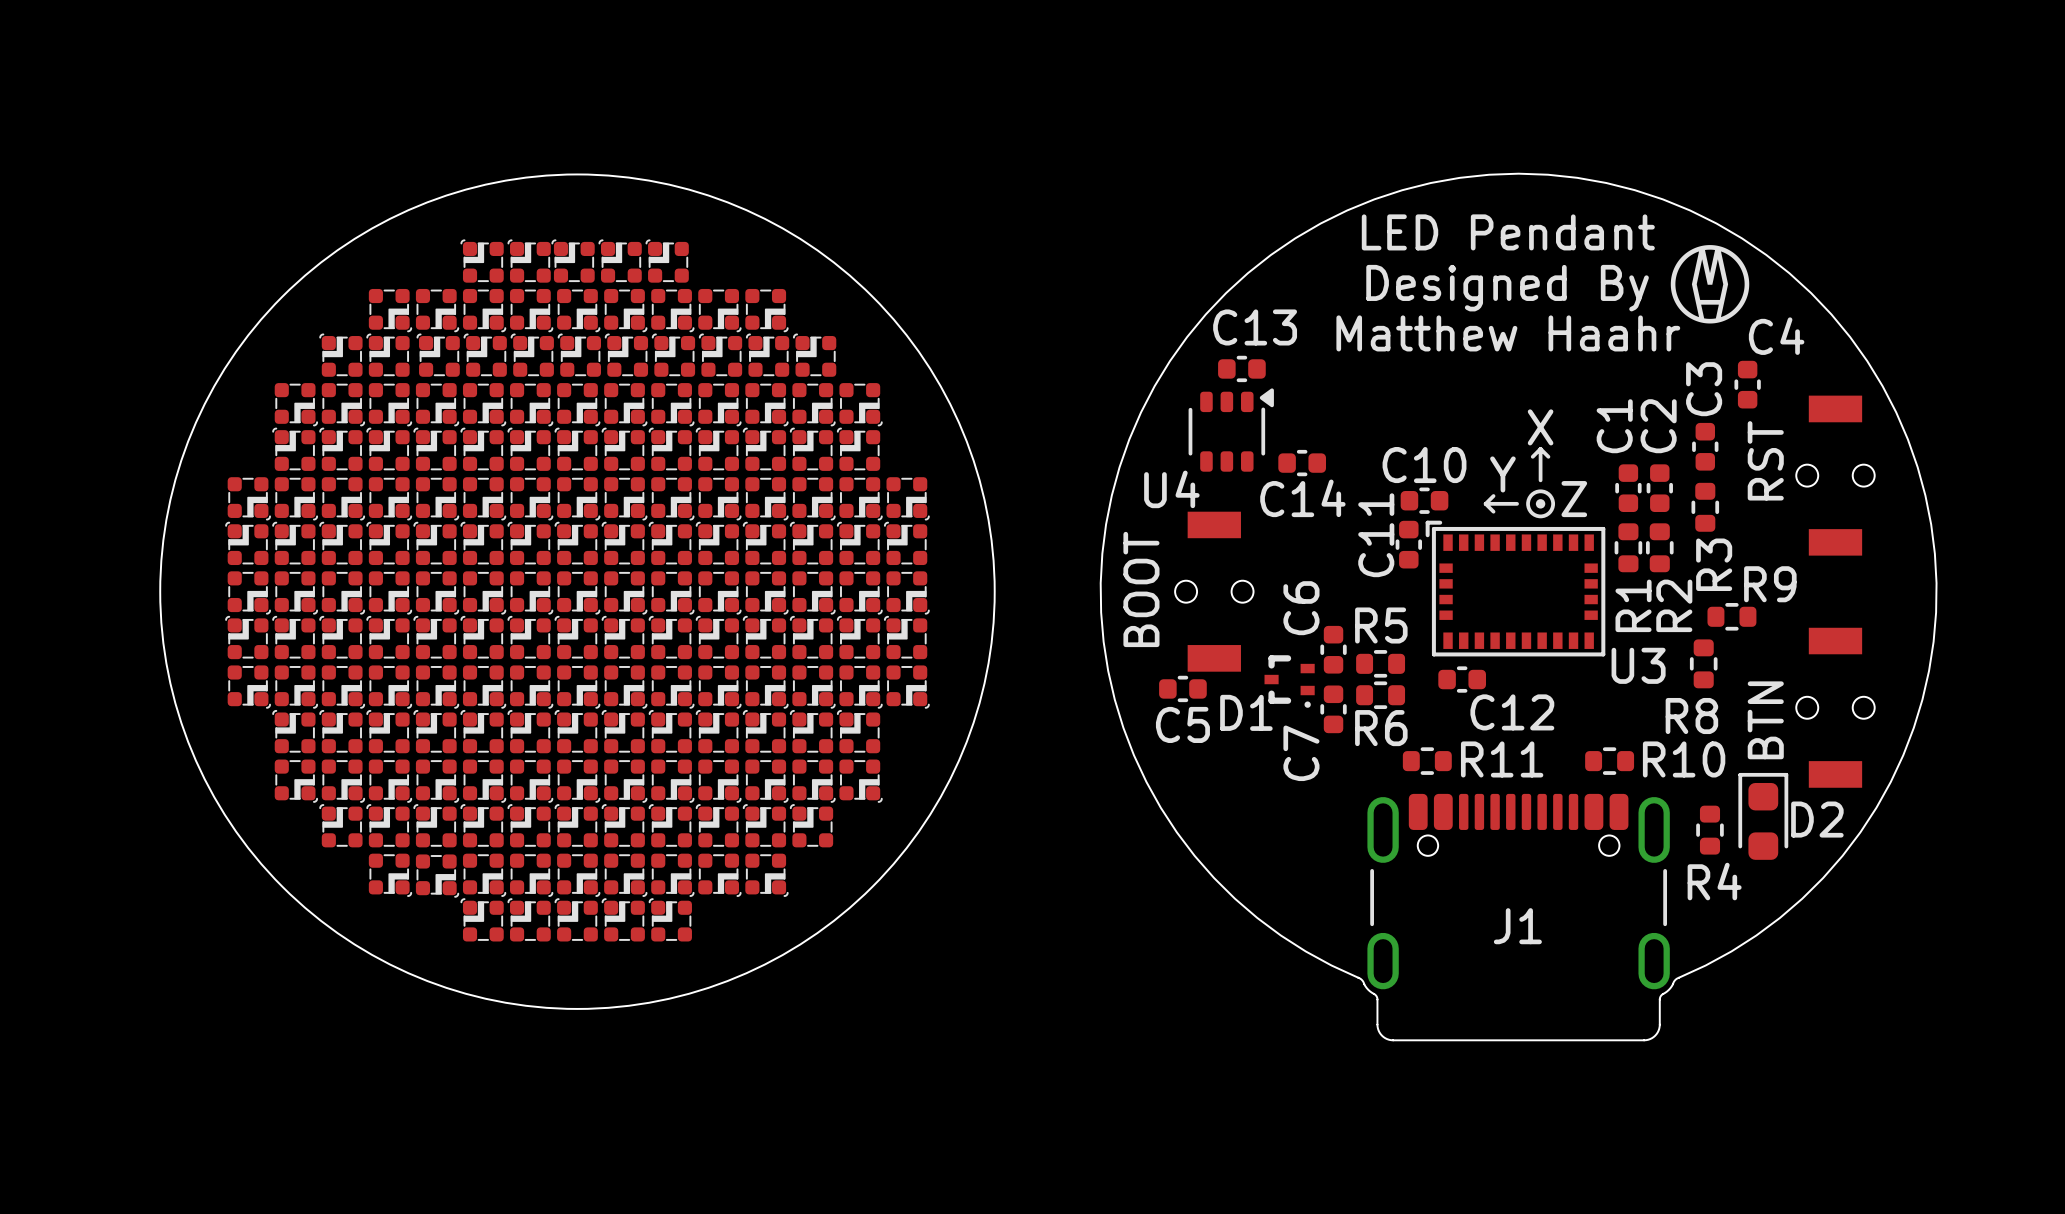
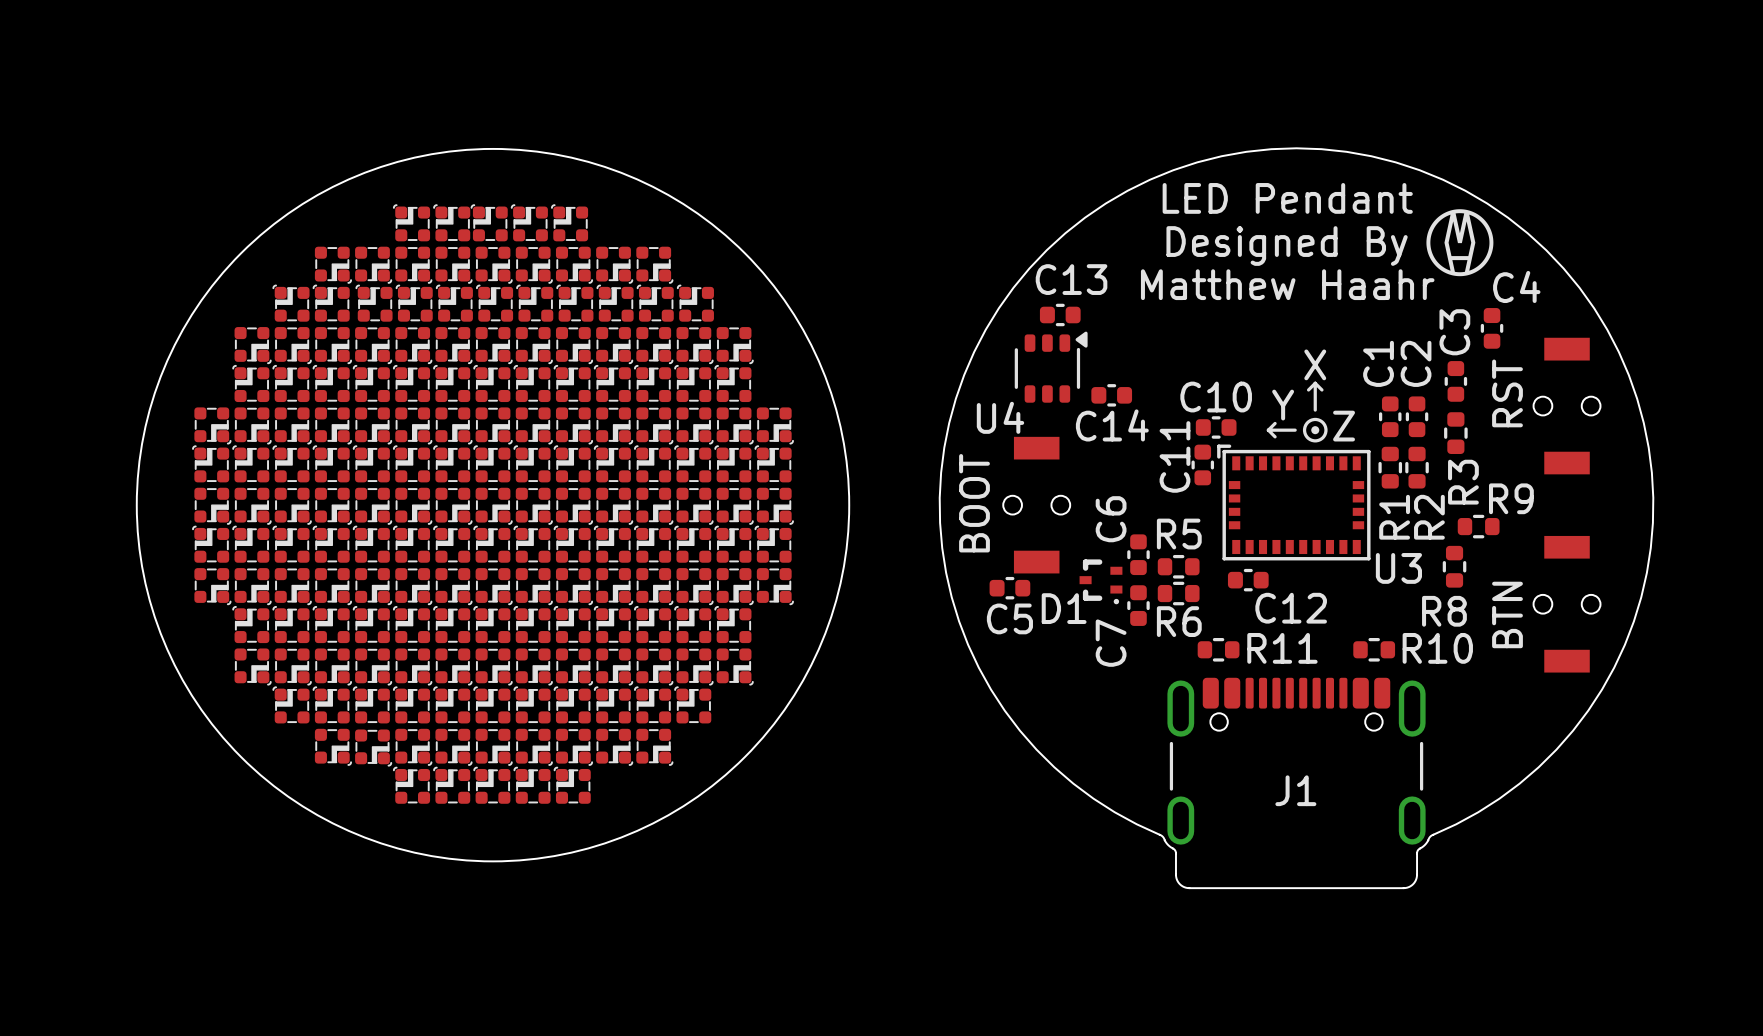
D2: (1763, 816) -> none
R4: (1709, 830) -> none

